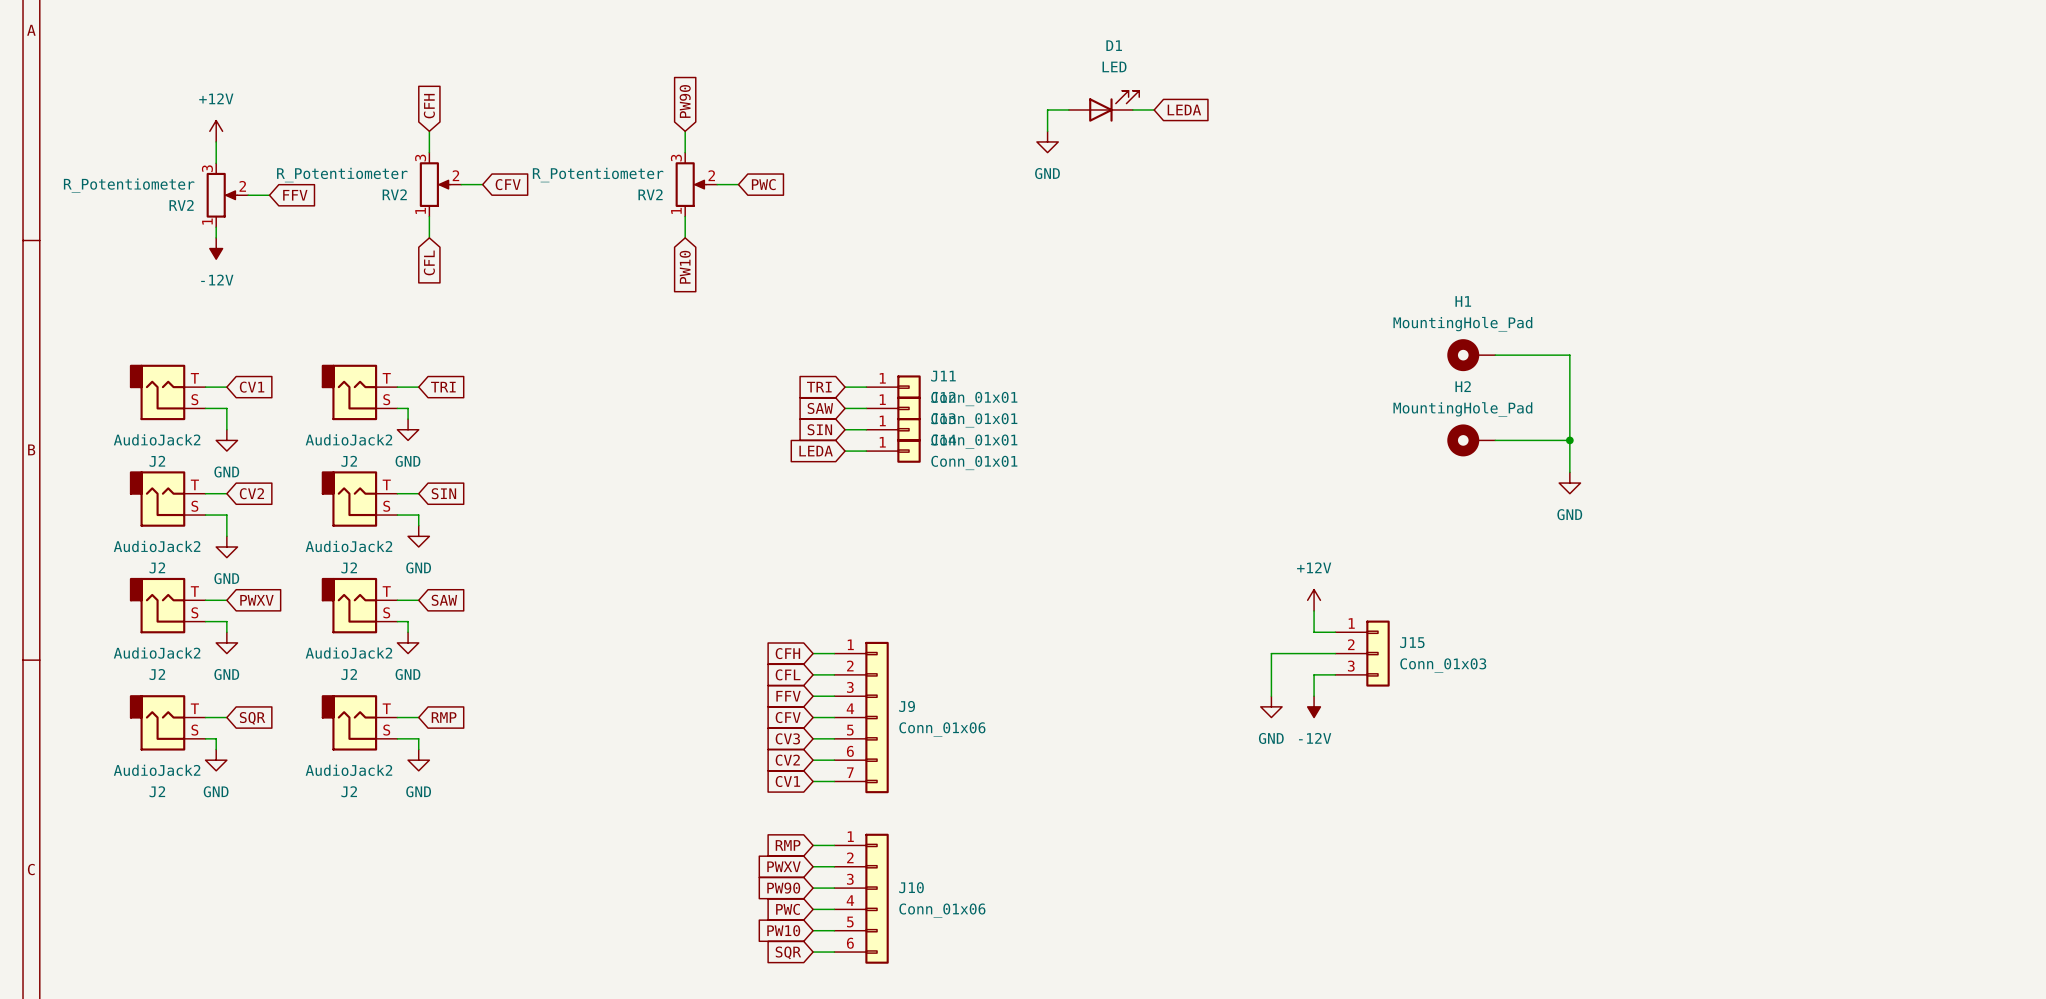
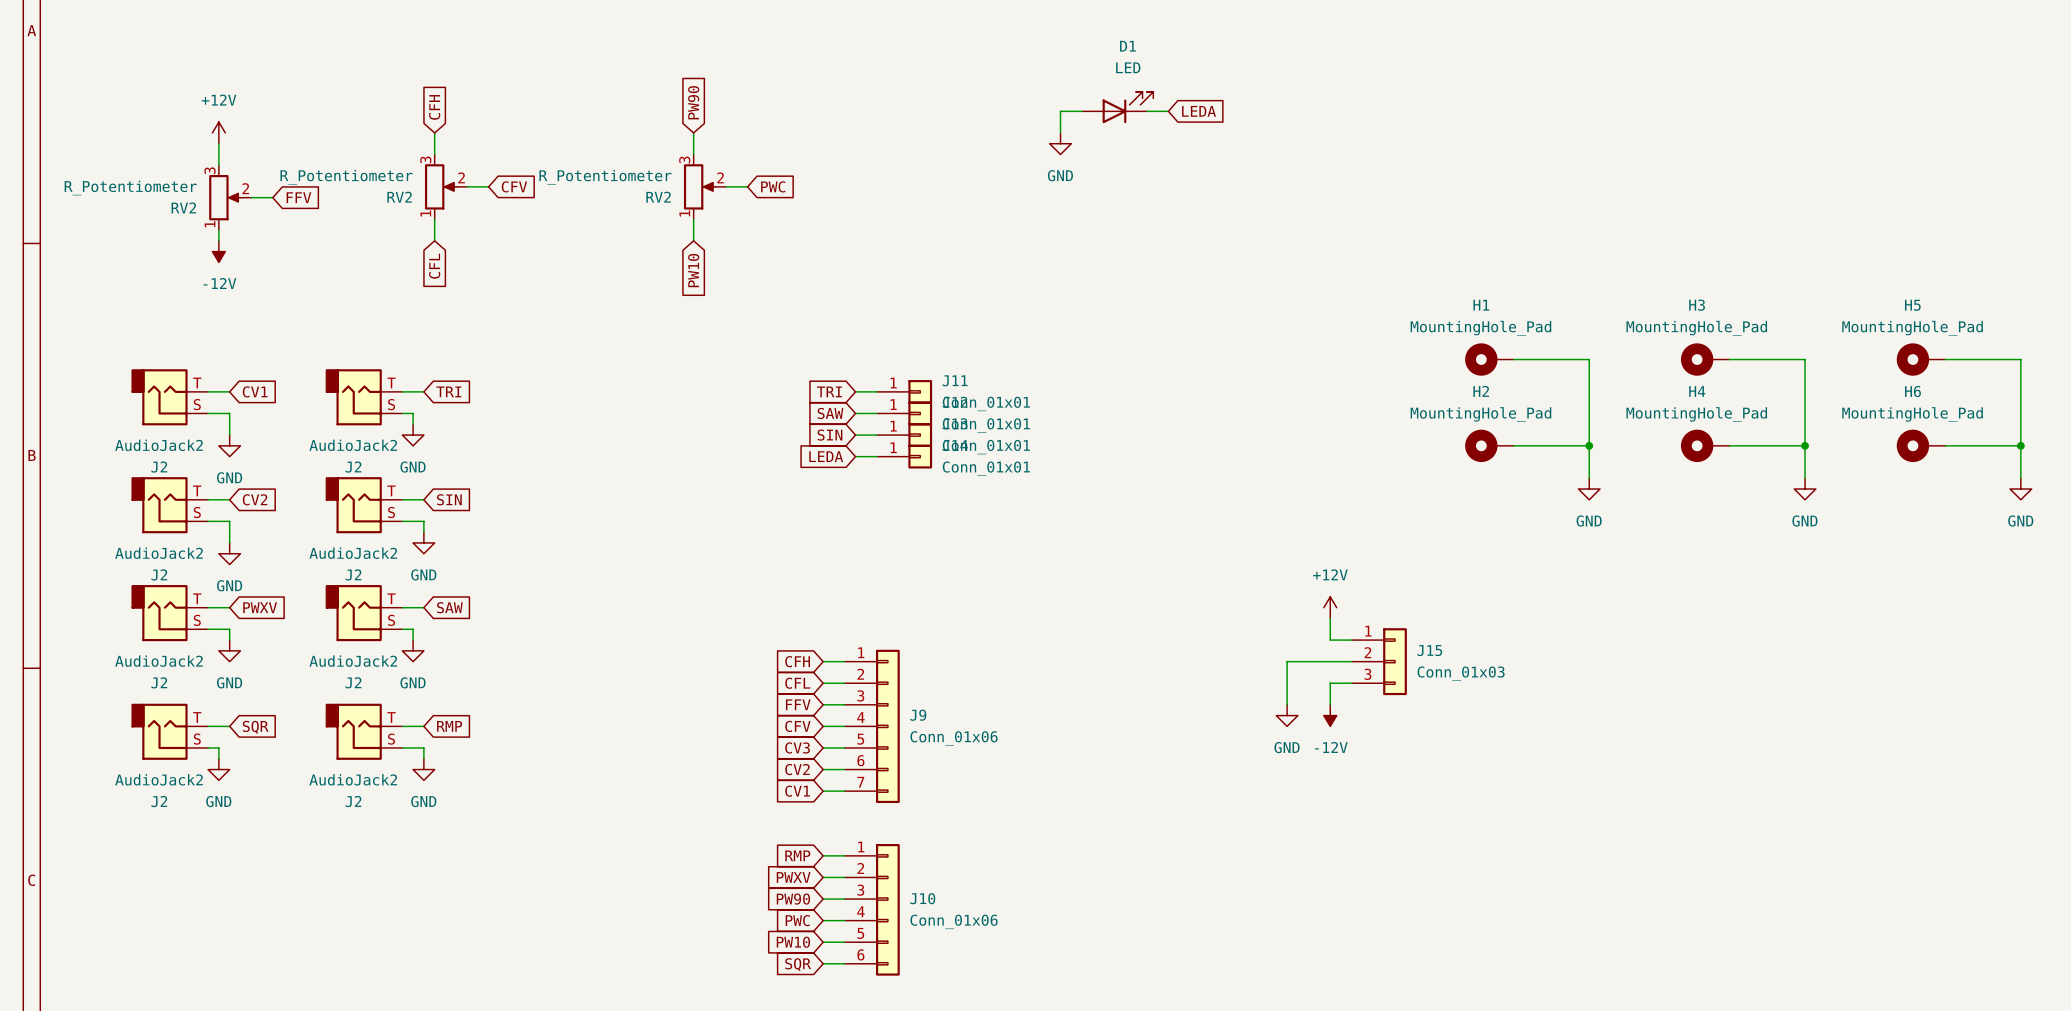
H3: none -> MountingHole_Pad (1705, 359)
wire: none -> (1729, 359) (1805, 359) (1805, 478)
H5: none -> MountingHole_Pad (1921, 359)
wire: none -> (1945, 359) (2020, 359) (2020, 478)
H4: none -> MountingHole_Pad (1705, 445)
wire: none -> (1729, 445) (1805, 445)
junction: none -> (1805, 445)
H6: none -> MountingHole_Pad (1921, 445)
wire: none -> (1945, 445) (2020, 445)
junction: none -> (2020, 445)
power symbol: none -> GND (1805, 489)
power symbol: none -> GND (2020, 489)

